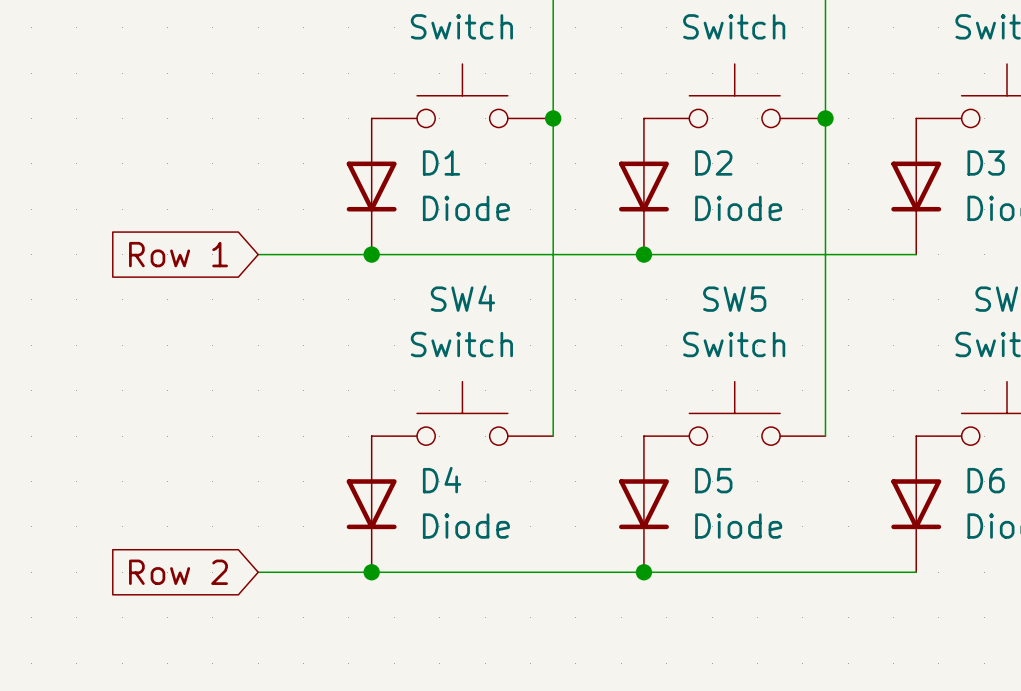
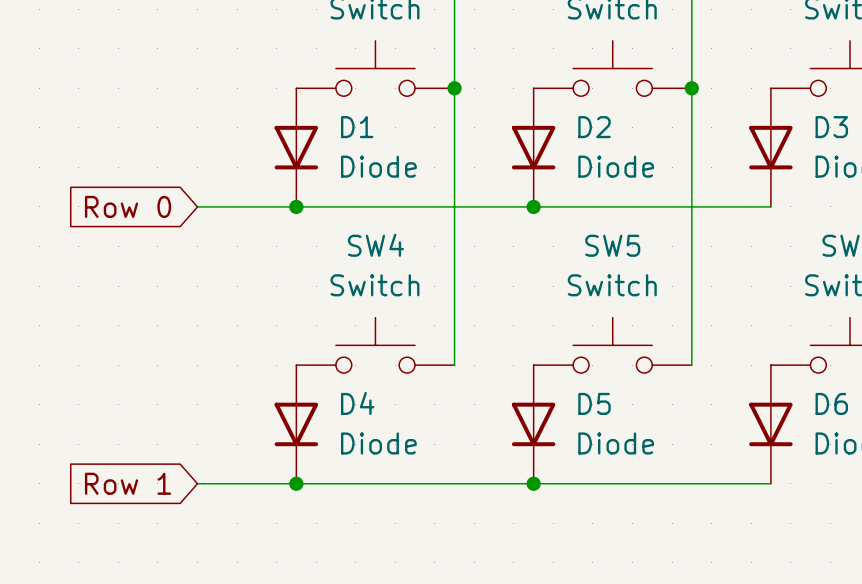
global label: Row 1 (178, 254) -> Row 0 (128, 206)
global label: Row 2 (178, 572) -> Row 1 (128, 483)

